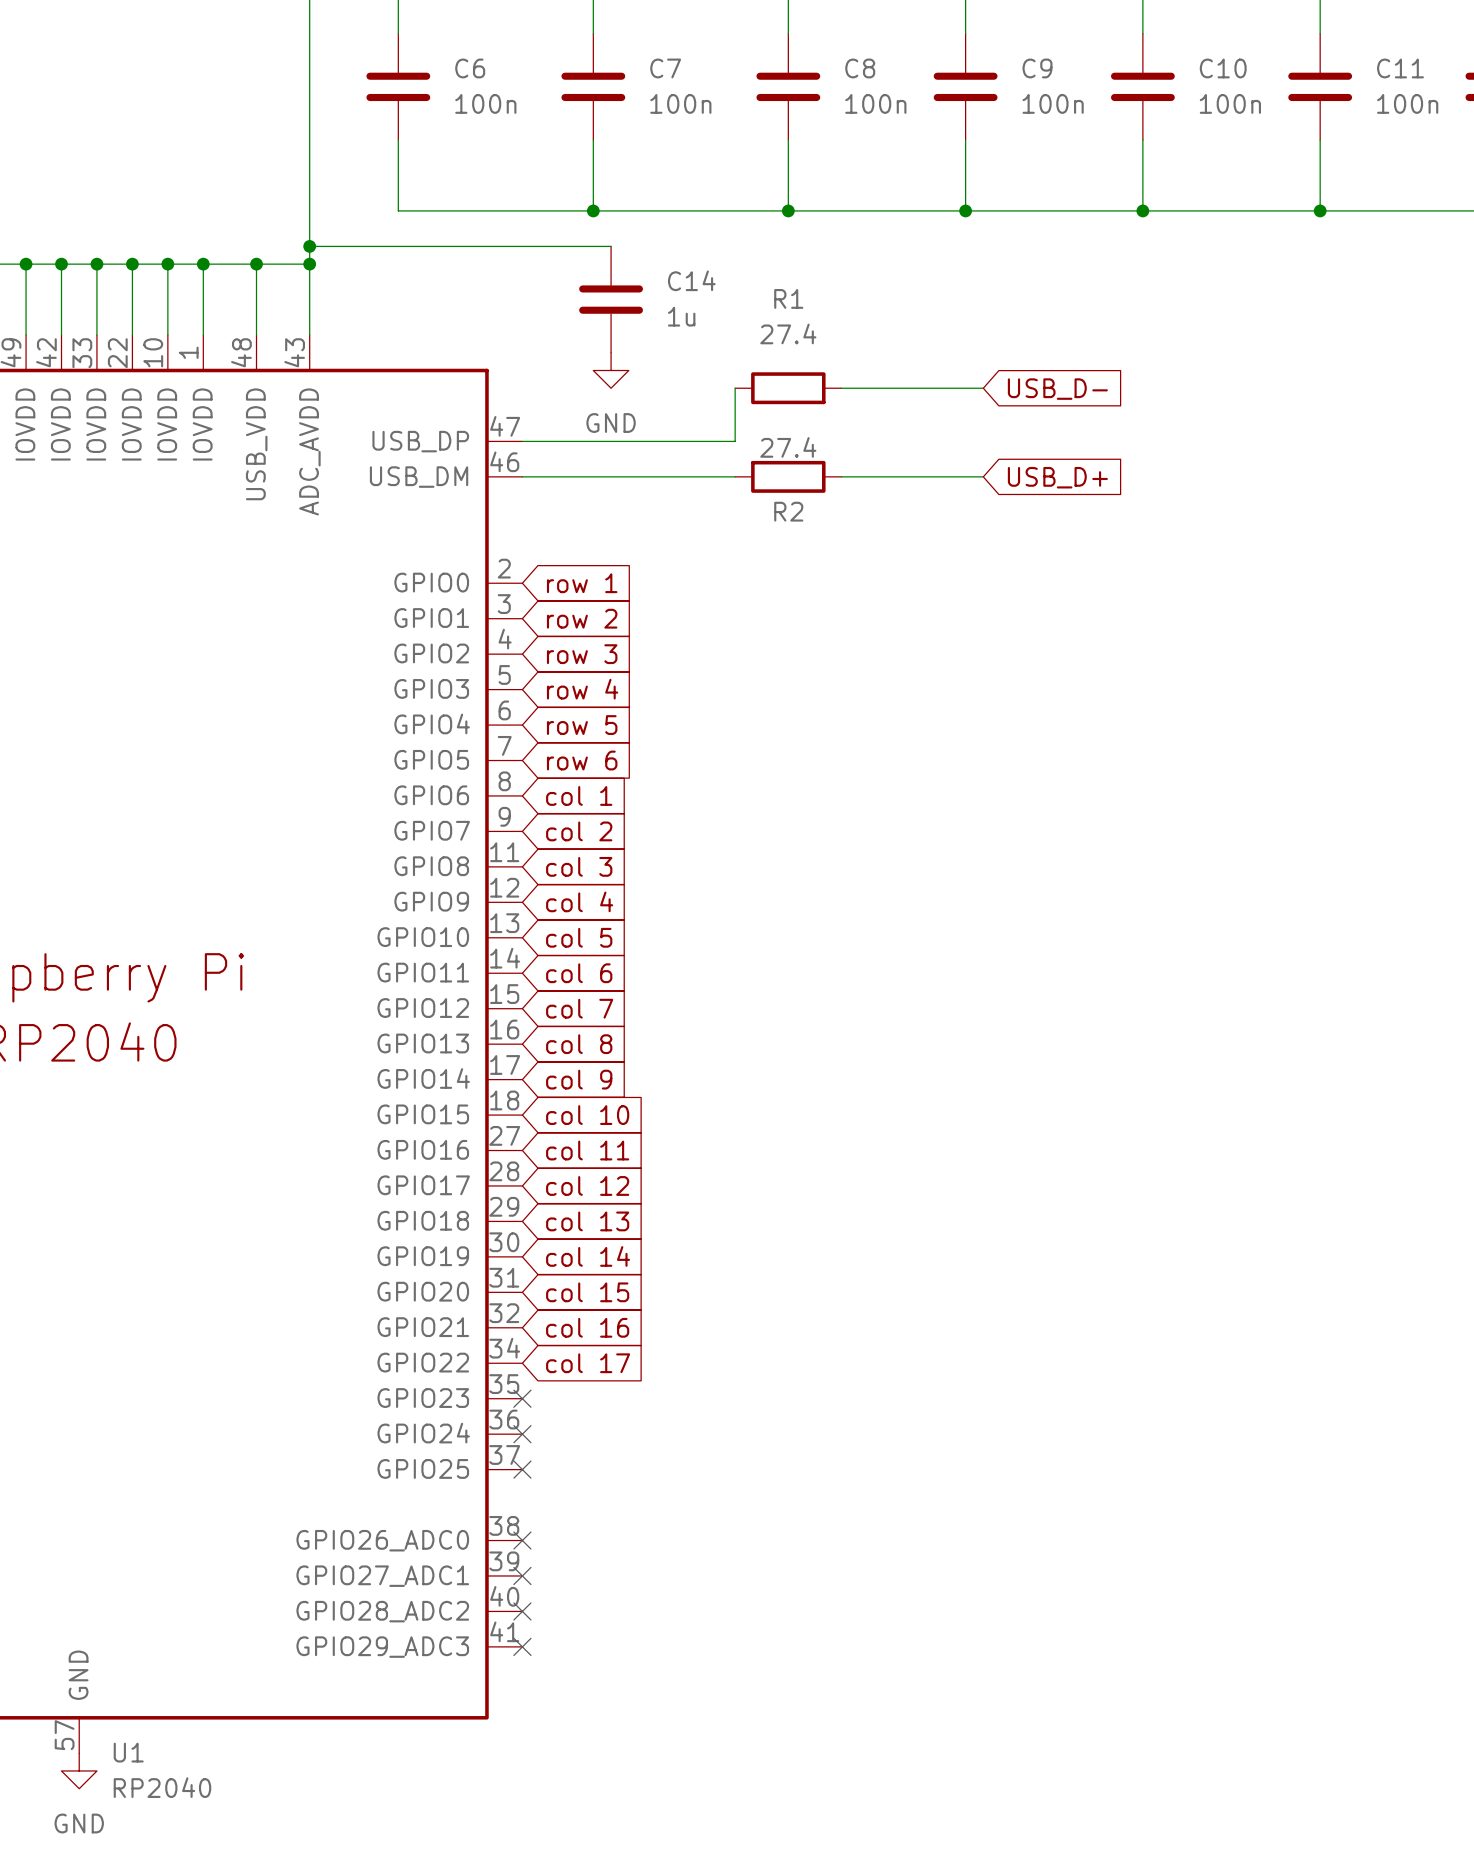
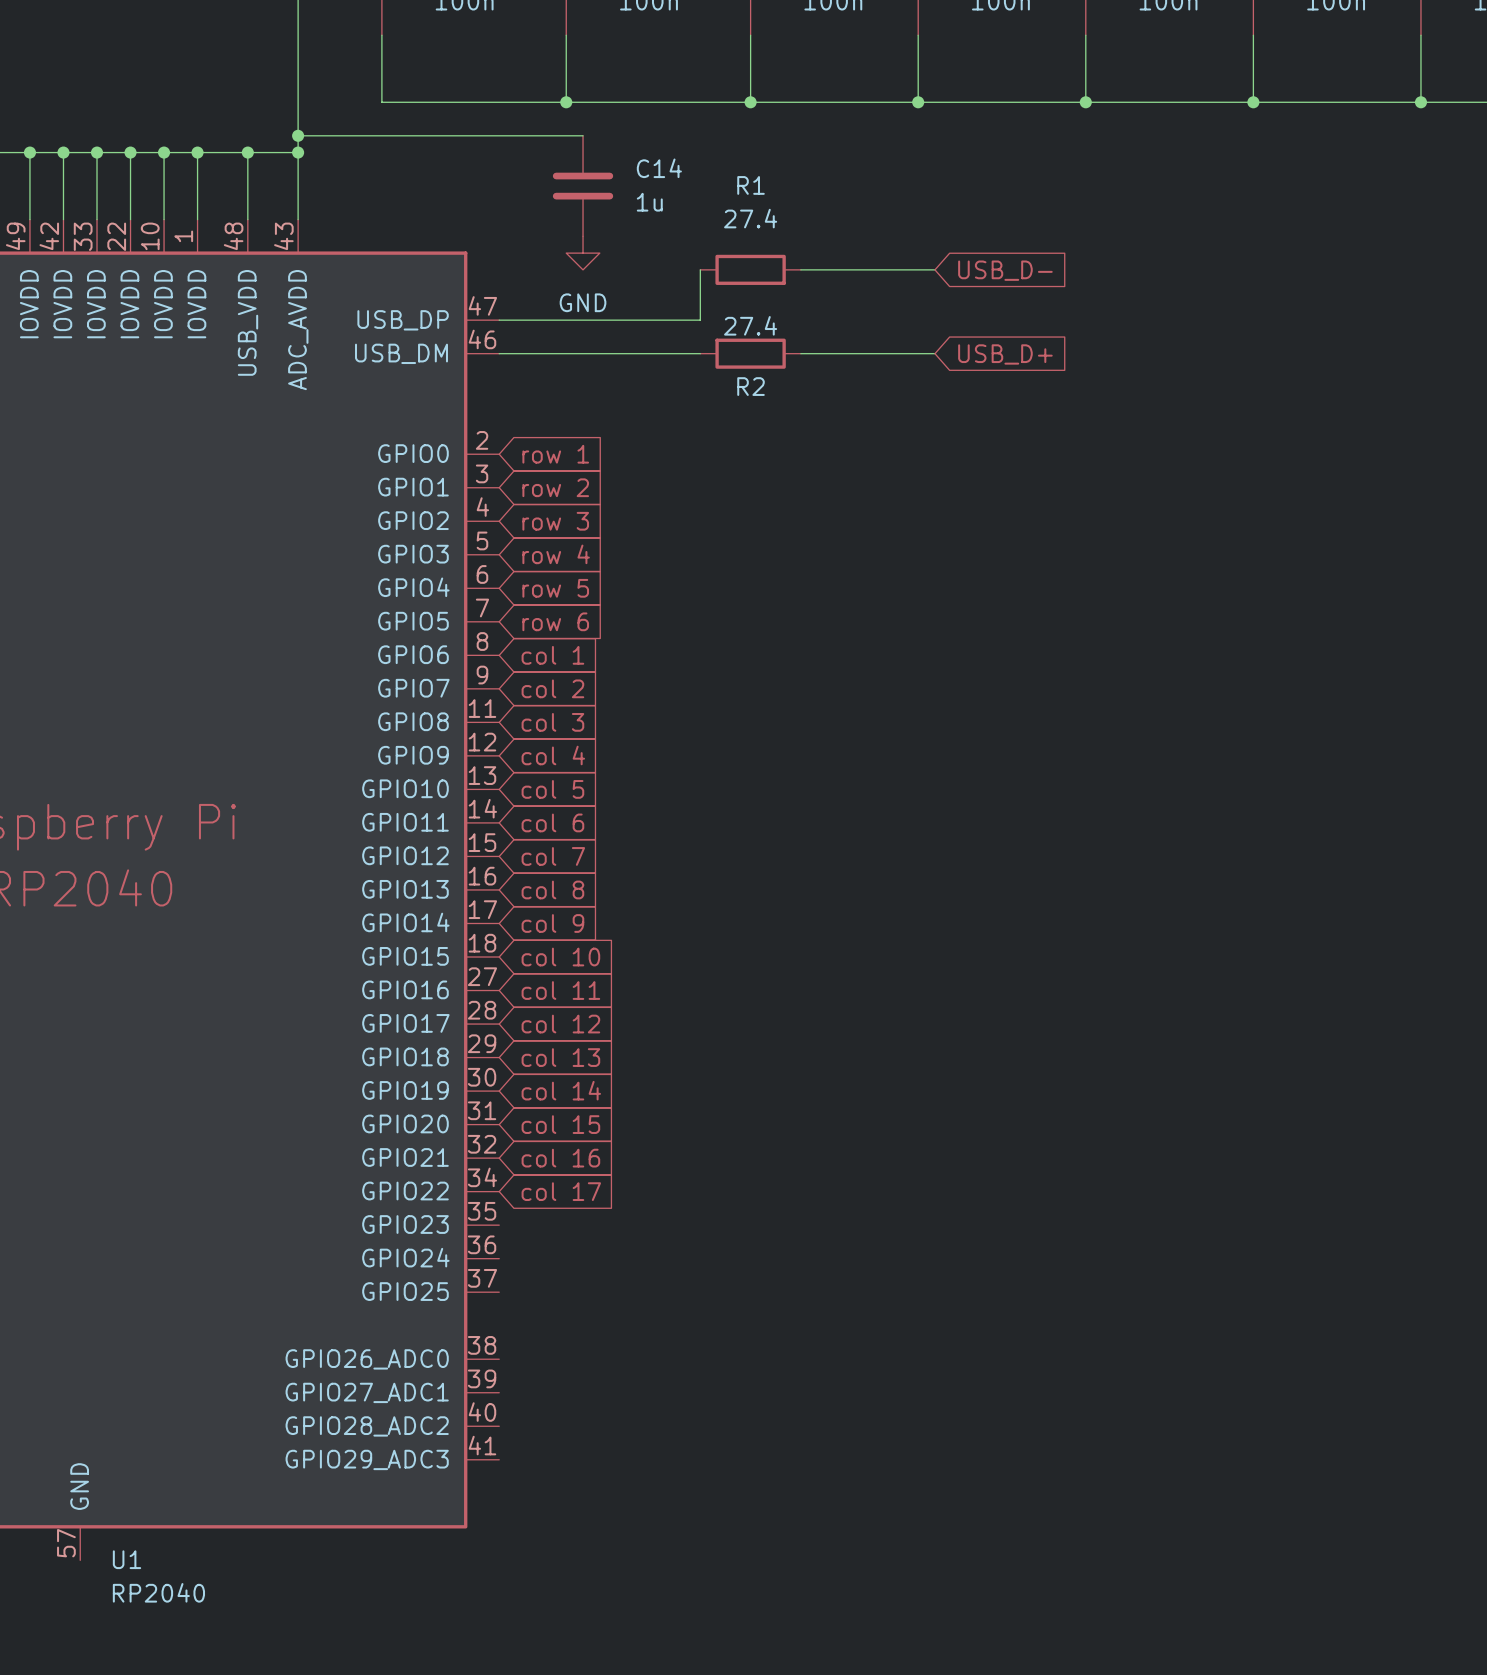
no-connect mark: (522, 1398) -> none
no-connect mark: (522, 1434) -> none
no-connect mark: (522, 1469) -> none
no-connect mark: (522, 1540) -> none
no-connect mark: (522, 1575) -> none
no-connect mark: (522, 1611) -> none
no-connect mark: (522, 1646) -> none
power symbol: GND (79, 1770) -> none

